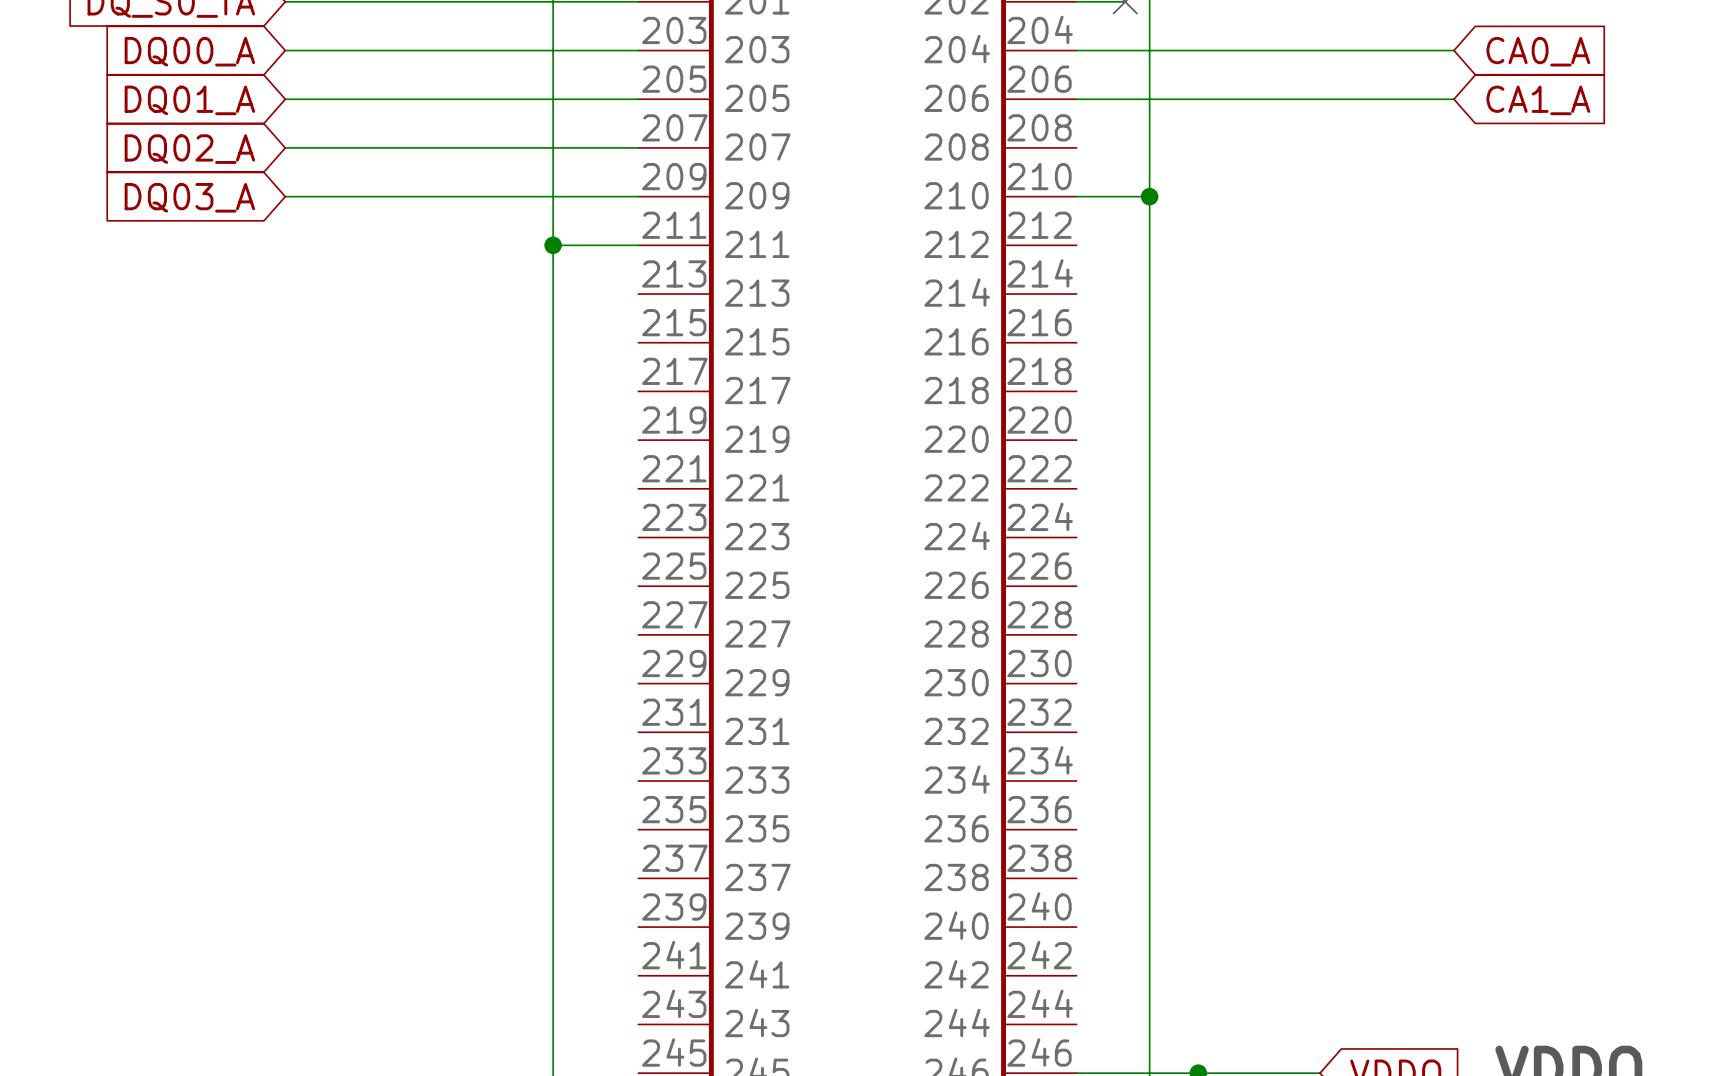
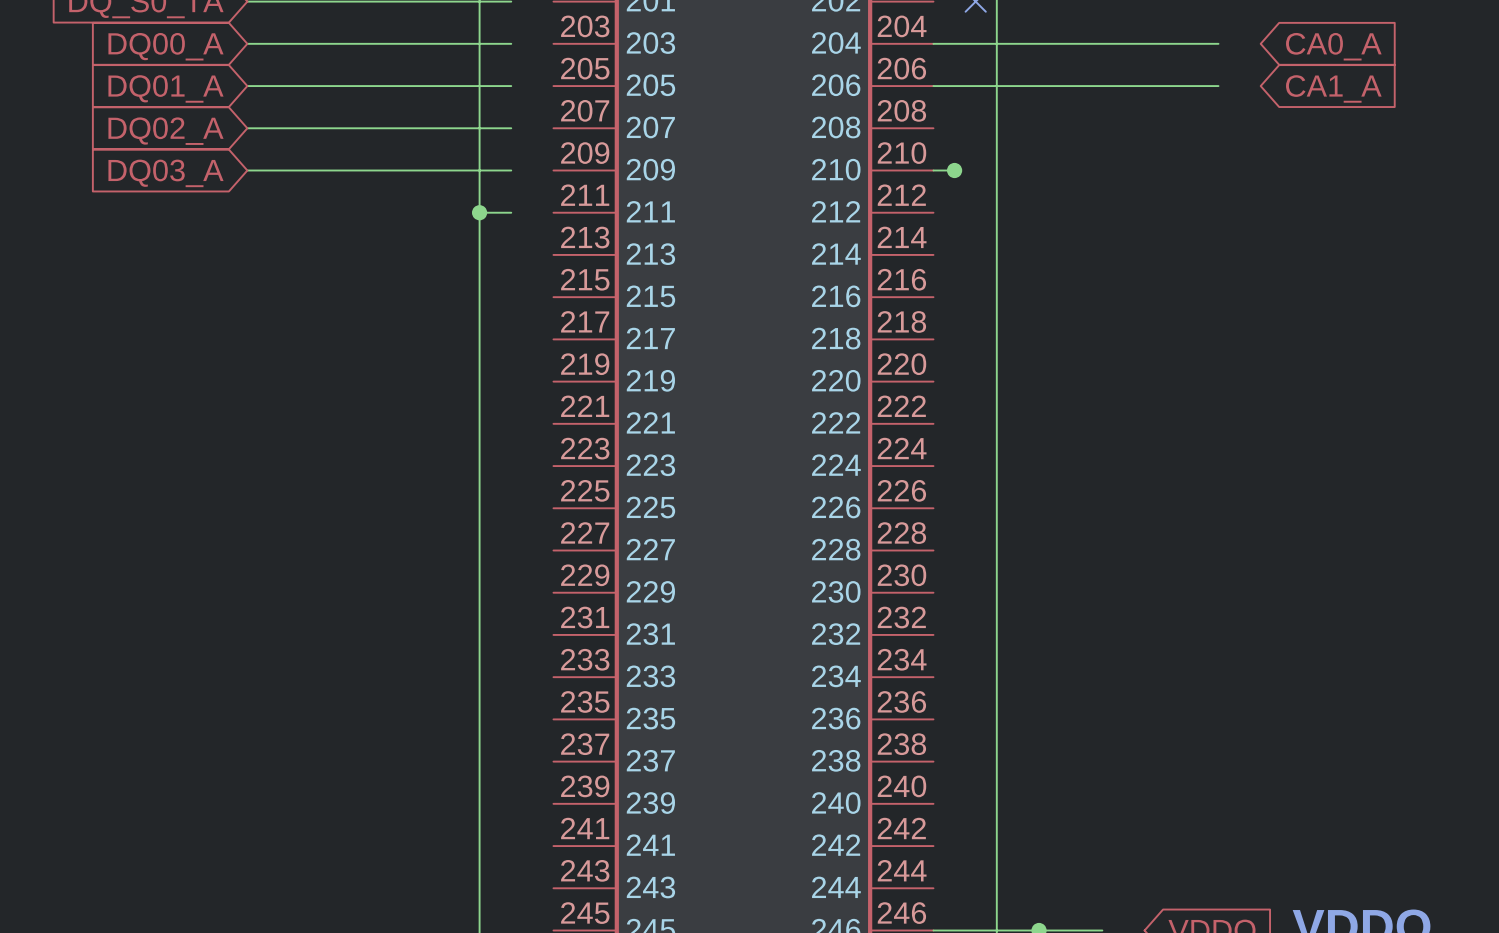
wire: (589, 1) (638, 1) -> none
wire: (1076, 1) (1125, 1) -> none
wire: (589, 50) (638, 50) -> none
wire: (1405, 50) (1453, 50) -> none
wire: (589, 99) (638, 99) -> none
wire: (1405, 99) (1453, 99) -> none
wire: (589, 147) (638, 147) -> none
wire: (589, 196) (638, 196) -> none
wire: (1100, 196) (1149, 196) -> none
junction position: (1149, 196) -> (954, 170)
wire: (589, 245) (638, 245) -> none
wire: (1271, 1073) (1320, 1073) -> none

